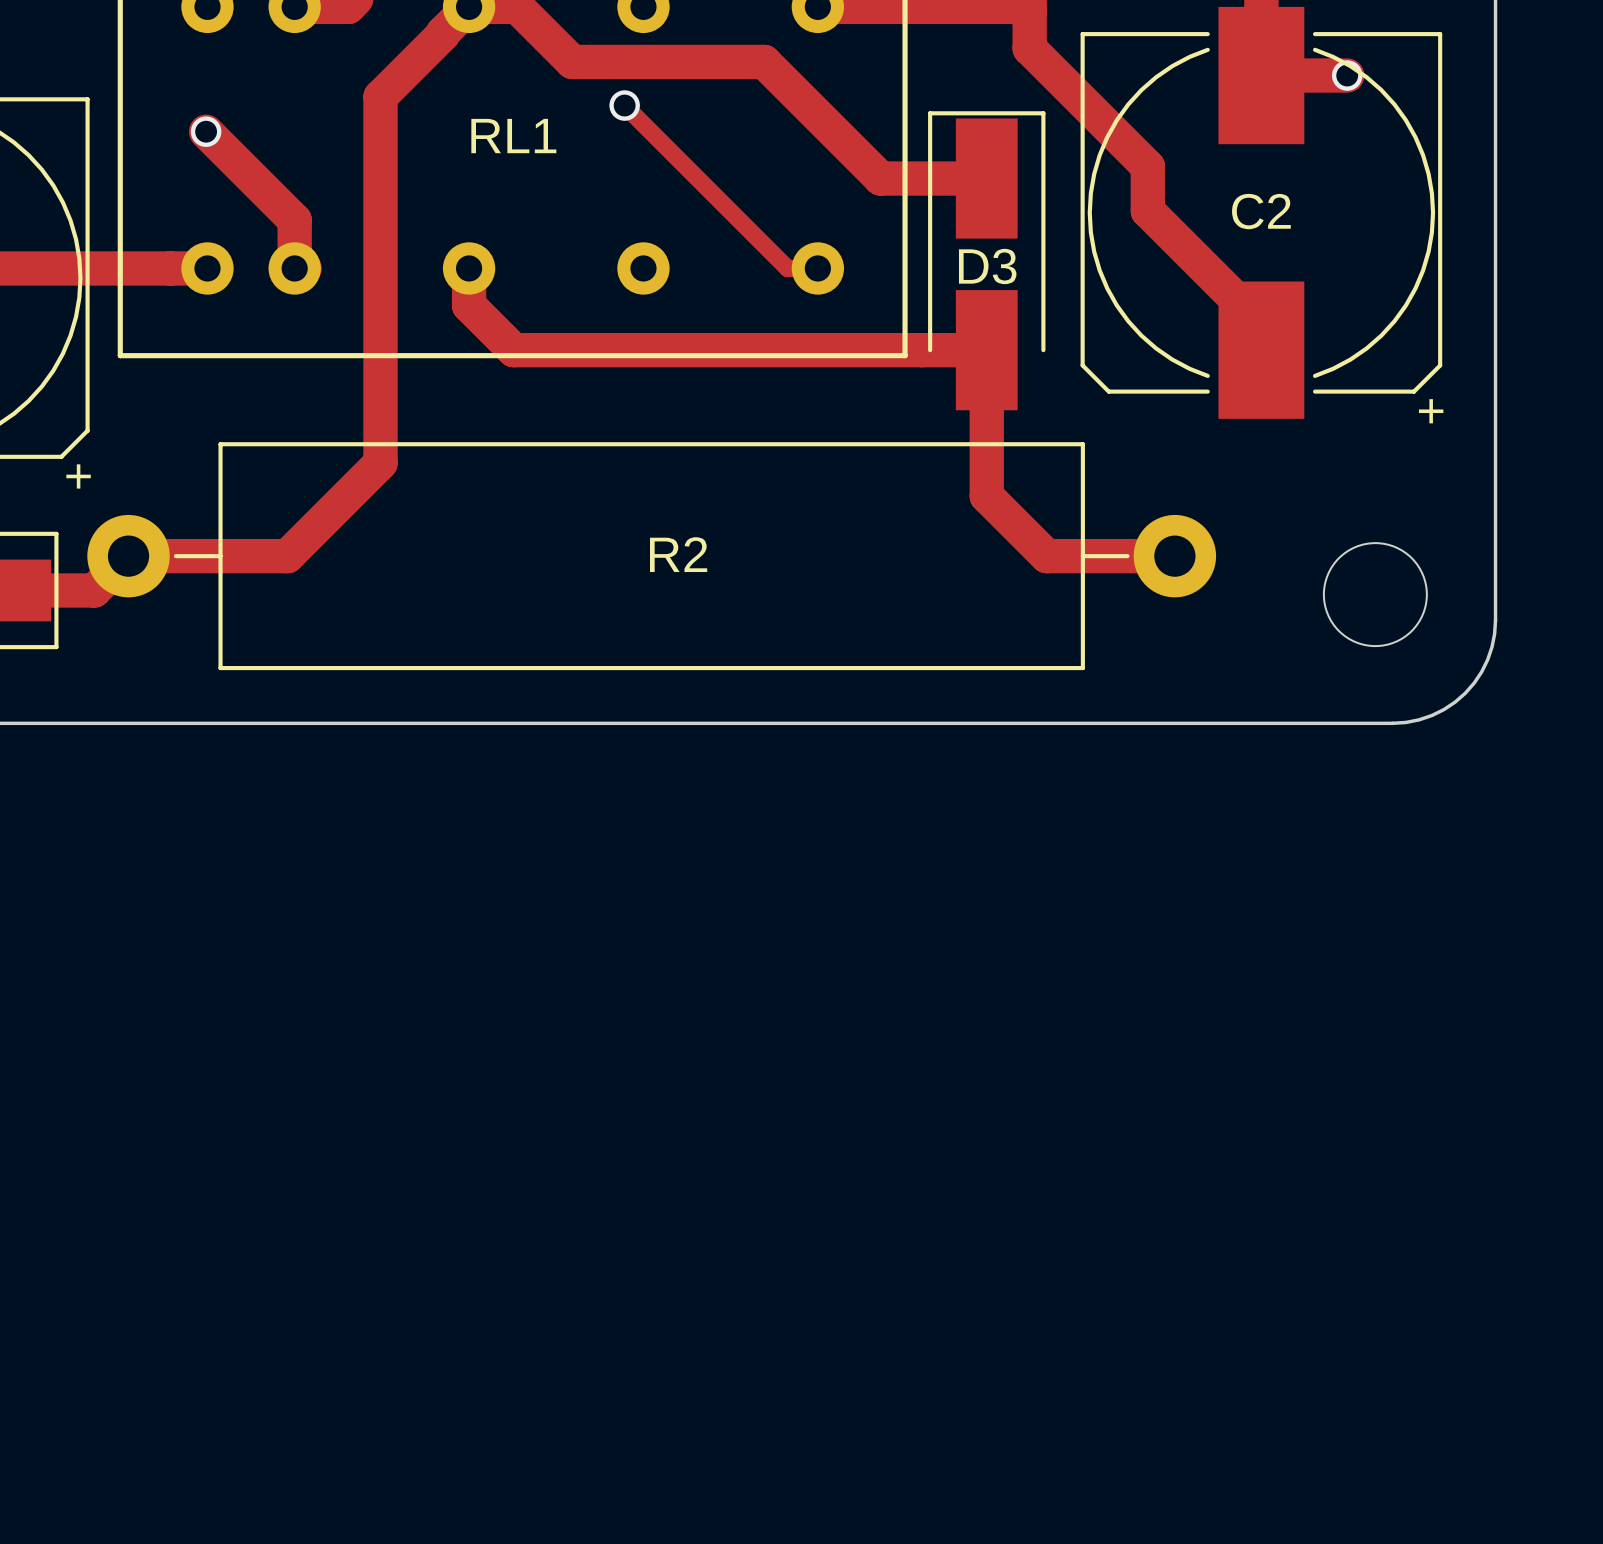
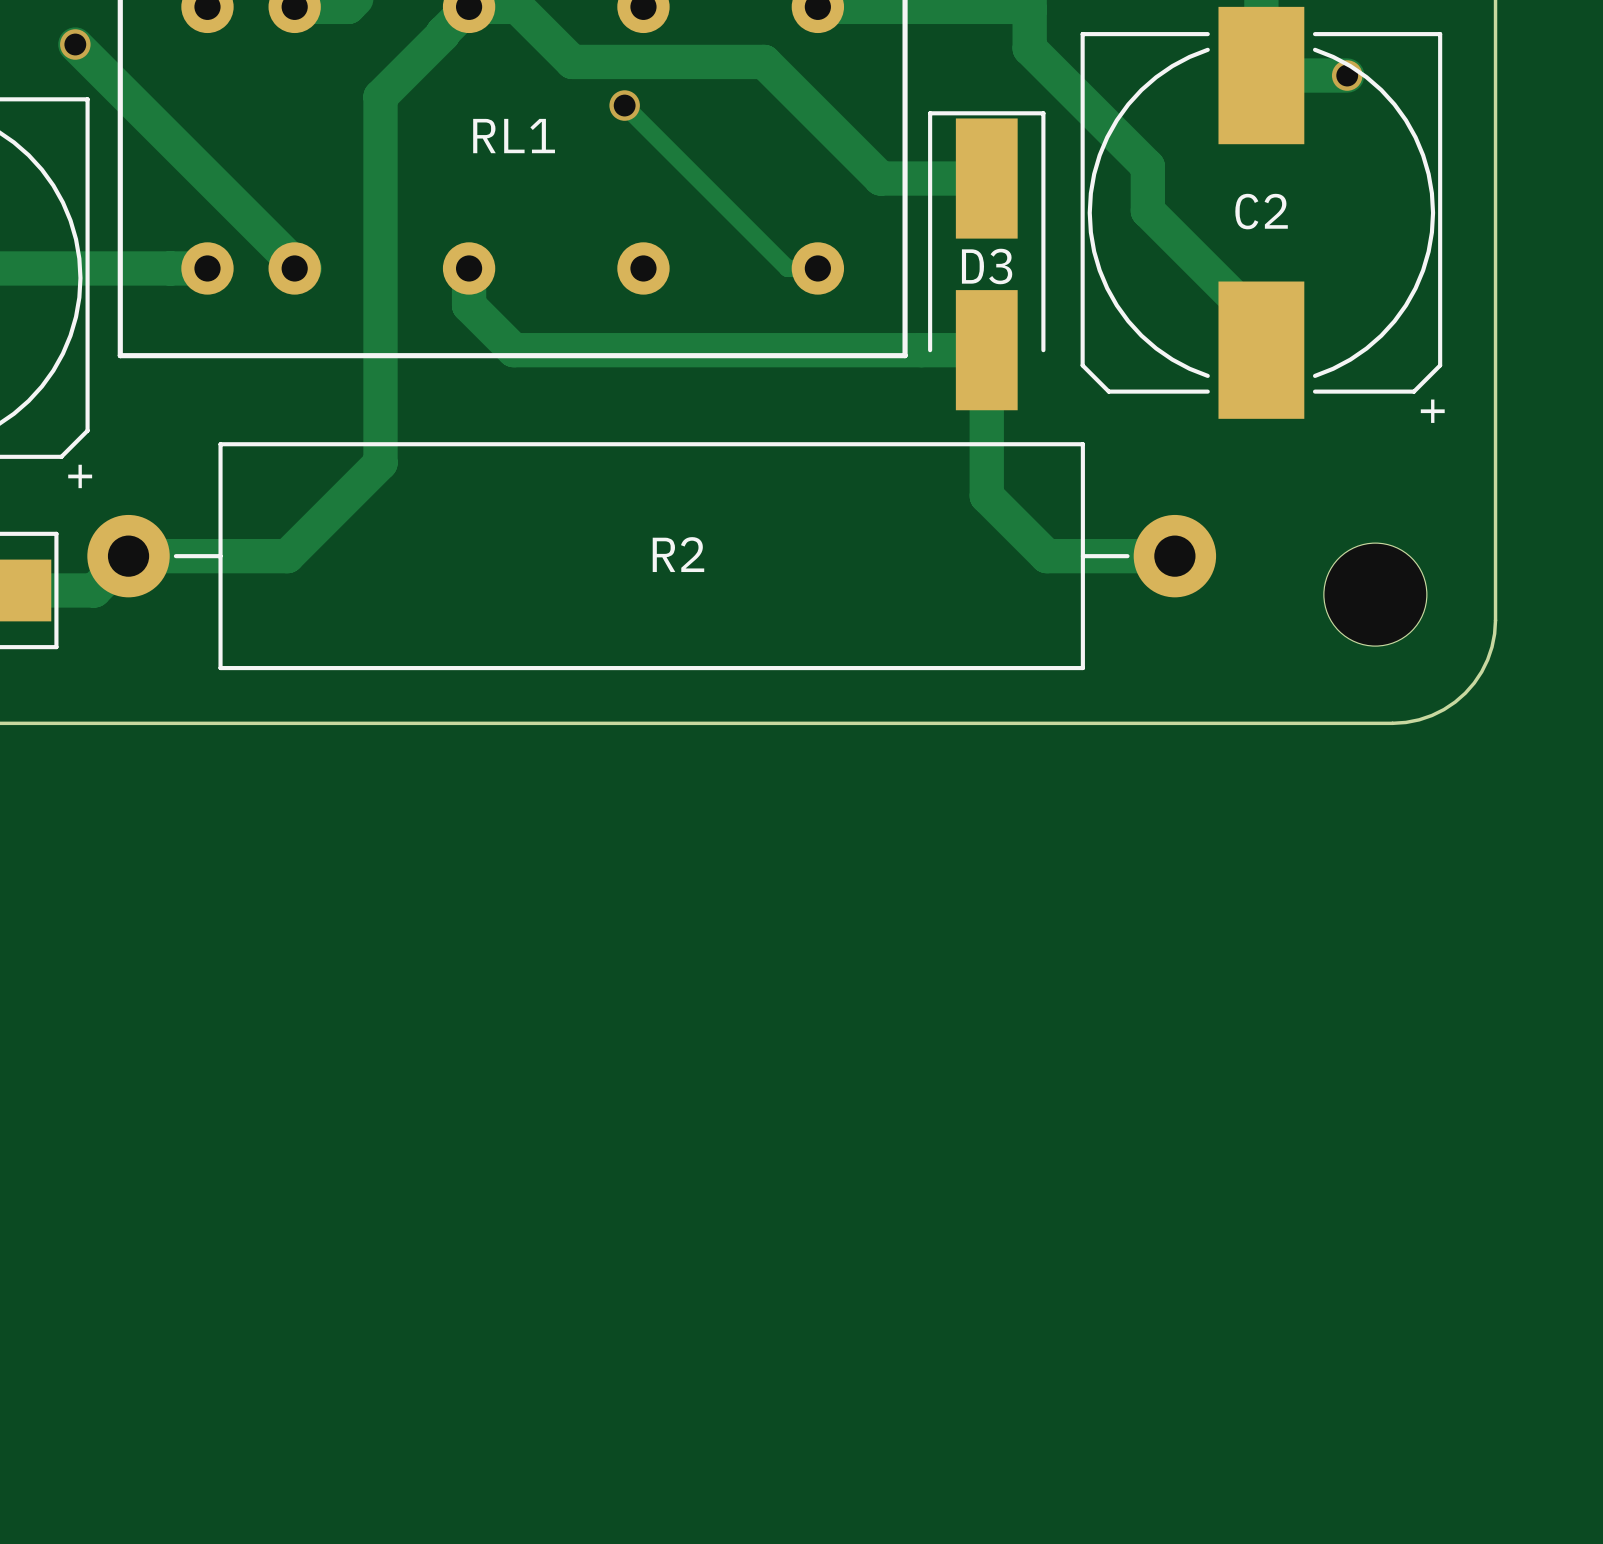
track: (206, 131) (294, 220) (294, 263) -> (75, 44) (294, 263)
via position: (206, 131) -> (75, 44)

